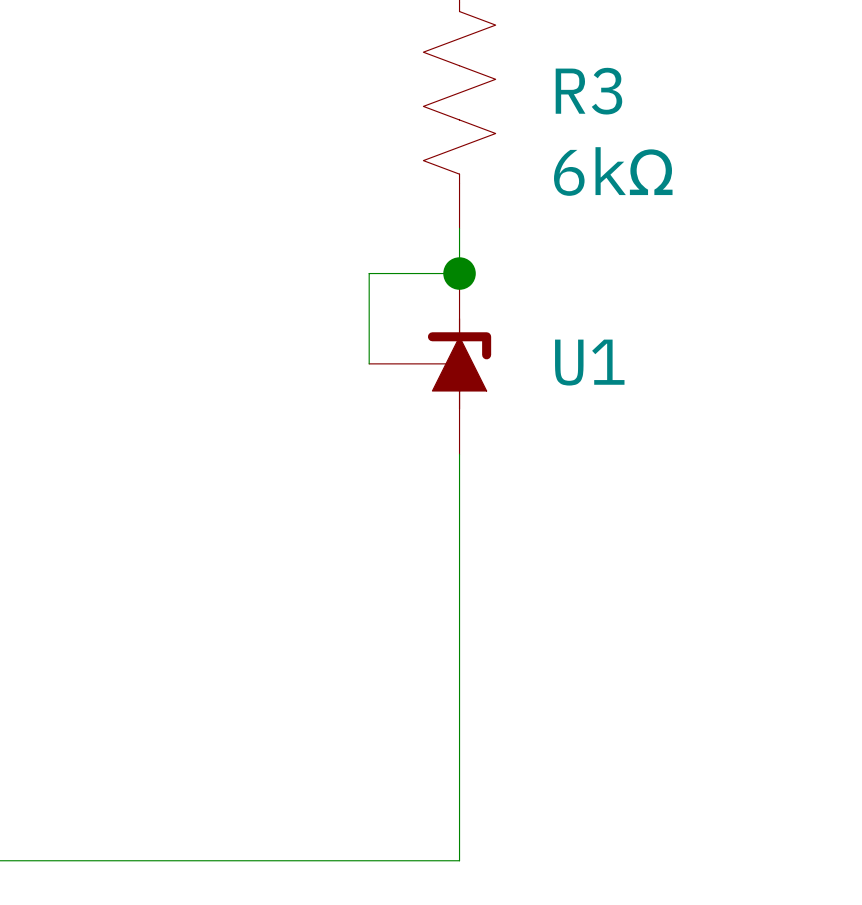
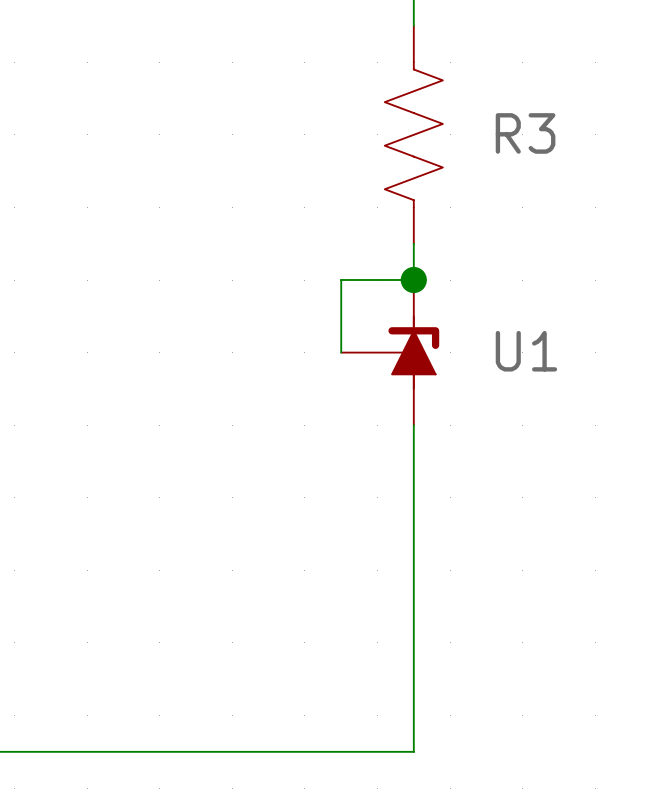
R3 value: 6kΩ (613, 171) -> none

